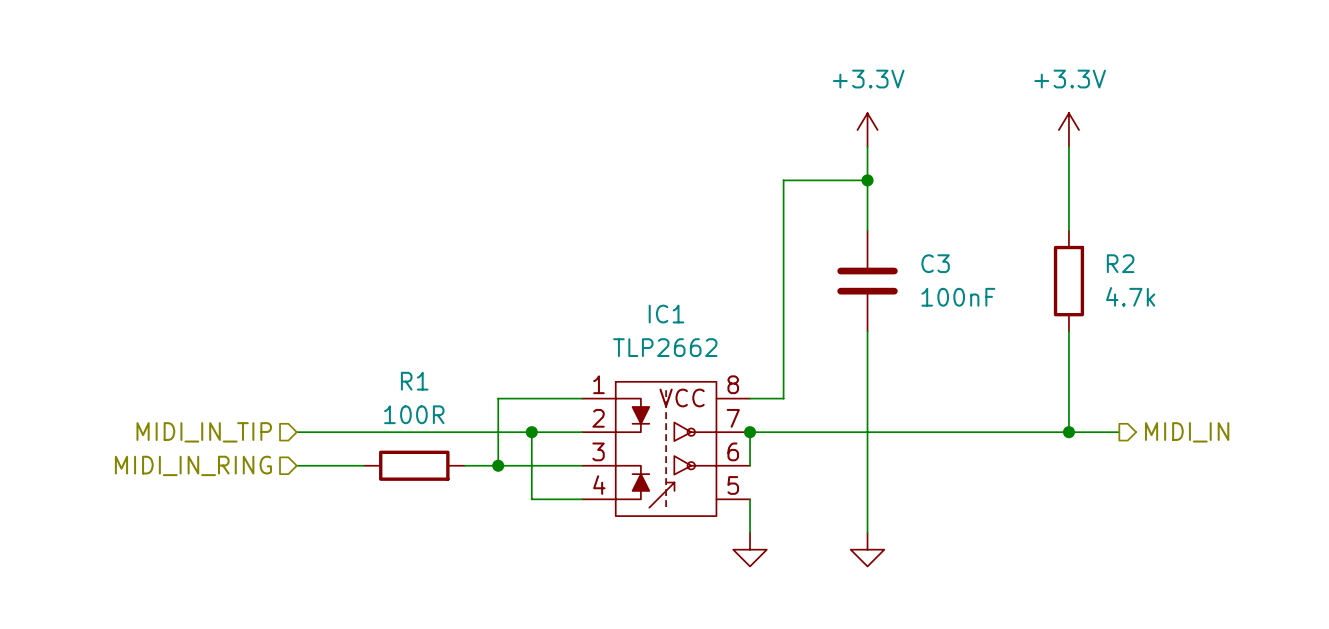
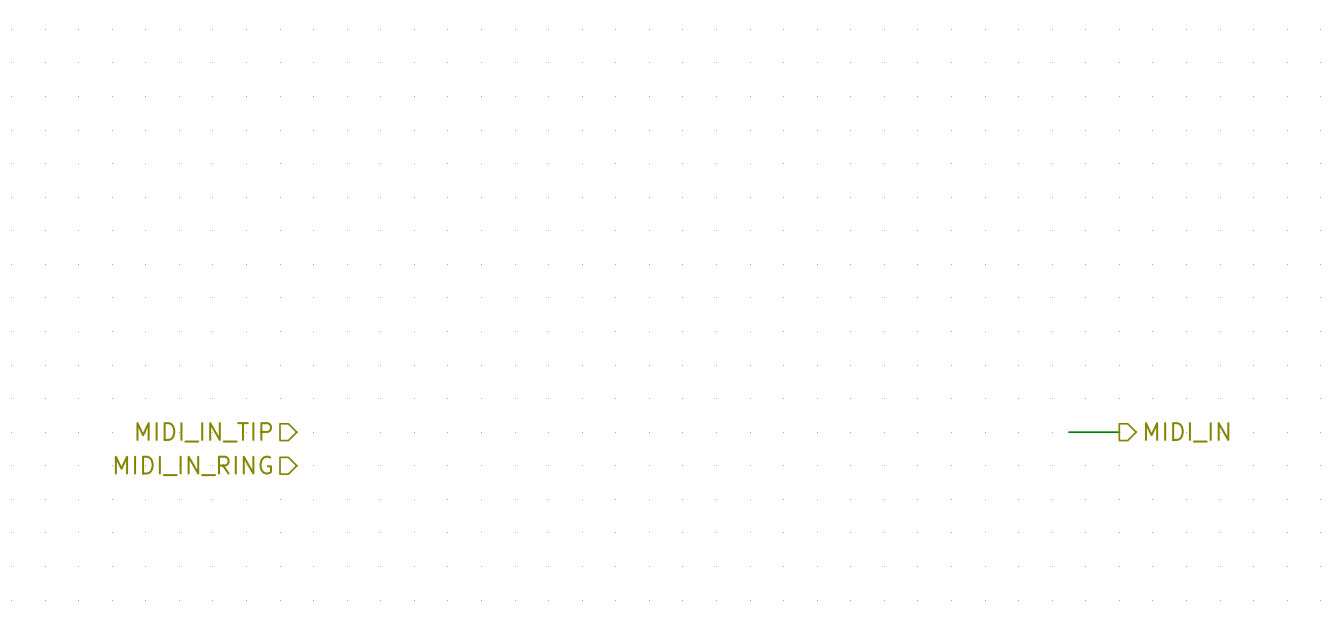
power symbol: +3.3V (867, 130) -> none
power symbol: +3.3V (1068, 130) -> none
wire: (867, 146) (867, 230) -> none
wire: (1068, 146) (1068, 230) -> none
wire: (867, 180) (783, 180) (783, 398) (750, 398) -> none
junction: (867, 180) -> none
C3: 100nF (867, 281) -> none
R2: 4.7k (1068, 281) -> none
wire: (867, 331) (867, 532) -> none
wire: (1068, 331) (1068, 432) (750, 432) (750, 465) -> none
wire: (582, 398) (498, 398) (498, 465) -> none
wire: (296, 432) (582, 432) -> none
wire: (531, 432) (531, 499) (582, 499) -> none
junction: (531, 432) -> none
junction: (750, 432) -> none
junction: (1068, 432) -> none
IC1: TLP2662 (666, 448) -> none
wire: (296, 465) (363, 465) -> none
R1: 100R (414, 465) -> none
wire: (464, 465) (582, 465) -> none
junction: (498, 465) -> none
wire: (750, 499) (750, 532) -> none
power symbol: (750, 549) -> none
power symbol: (867, 549) -> none

